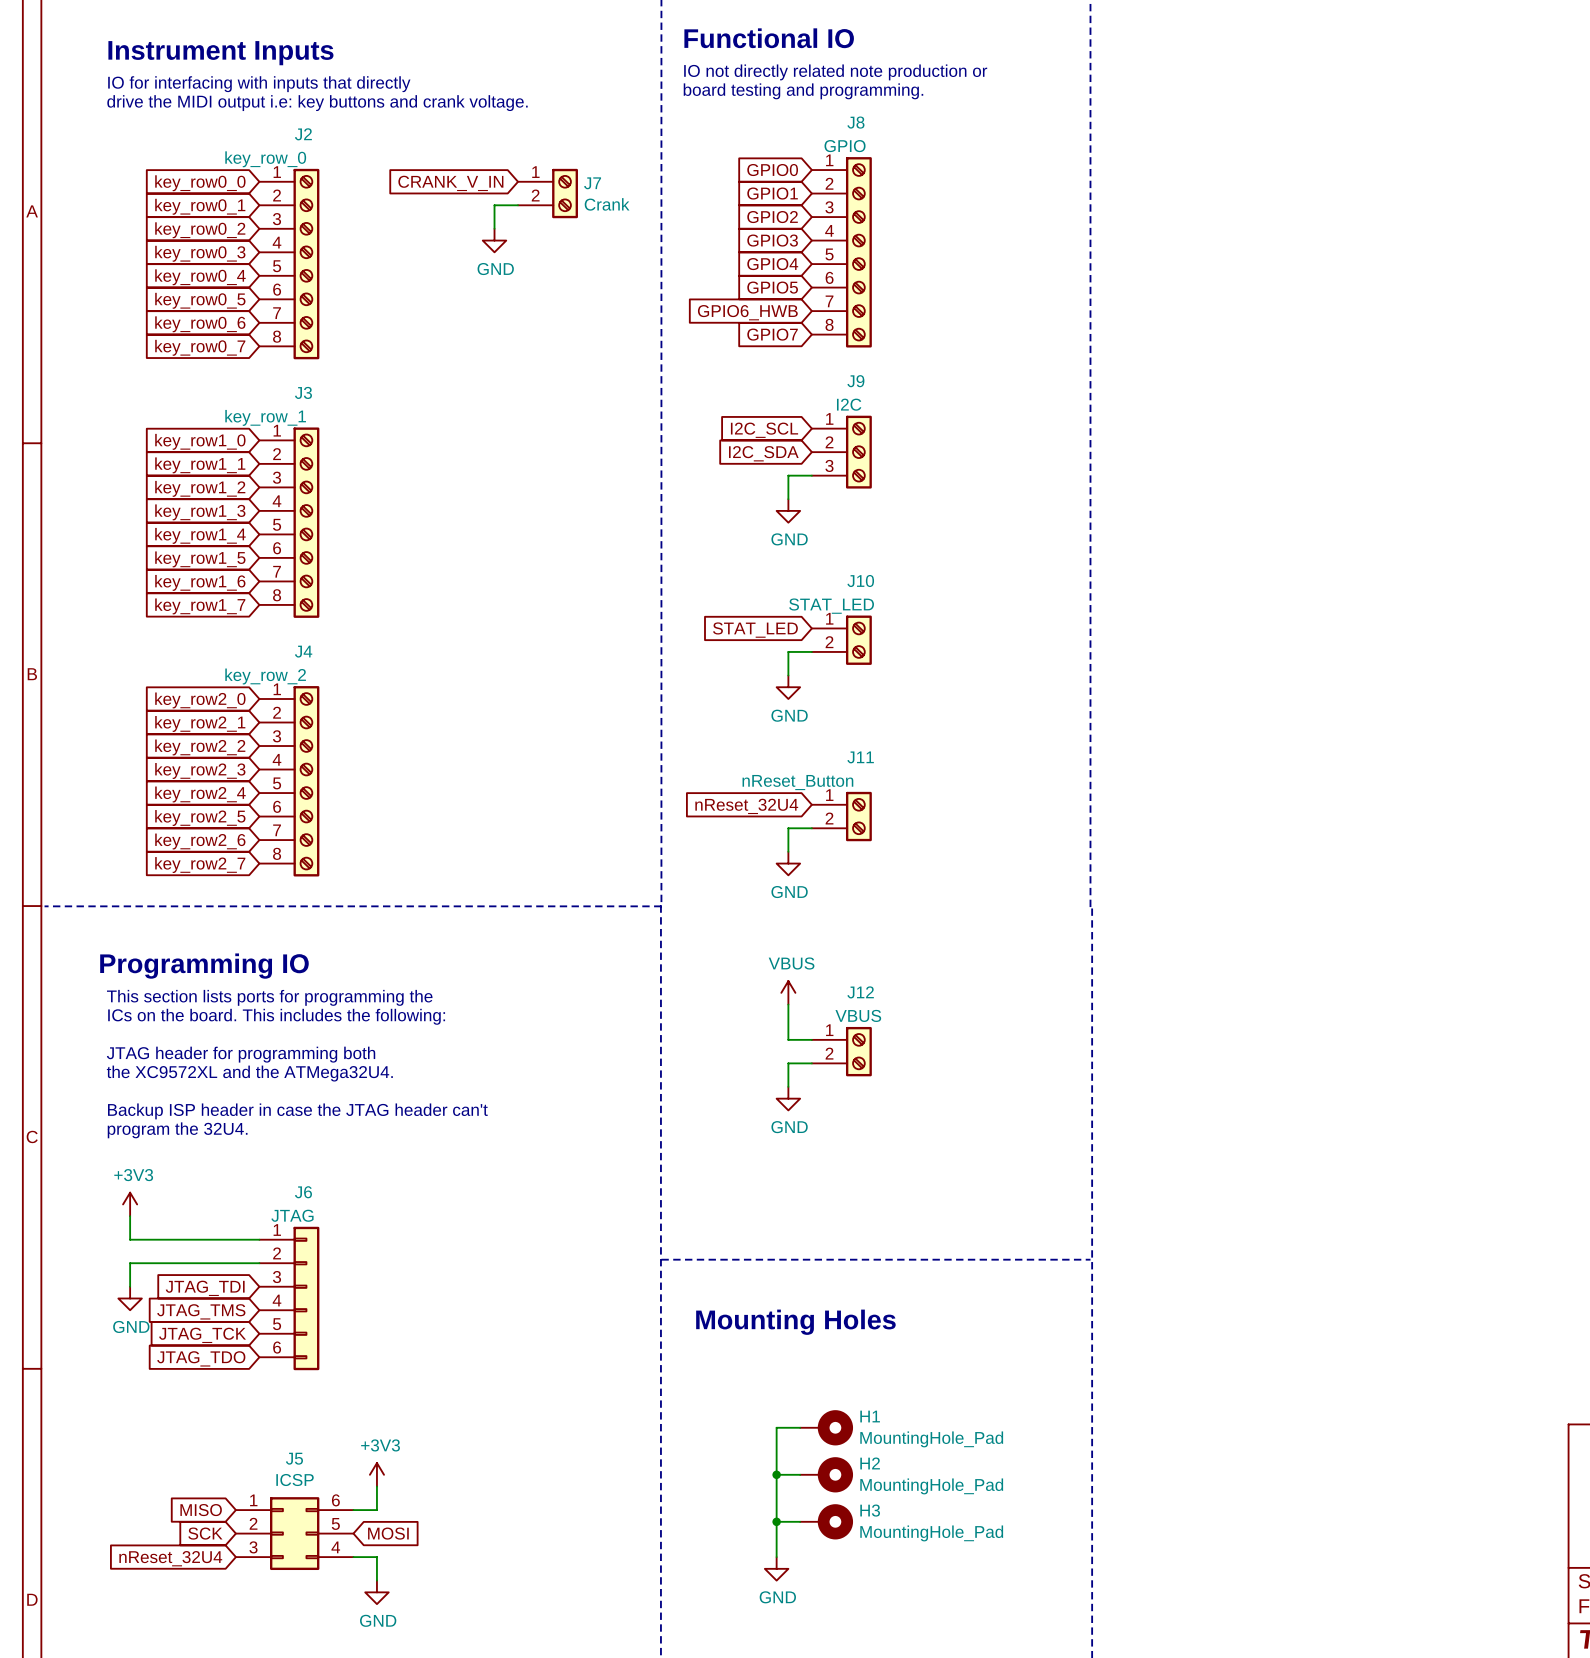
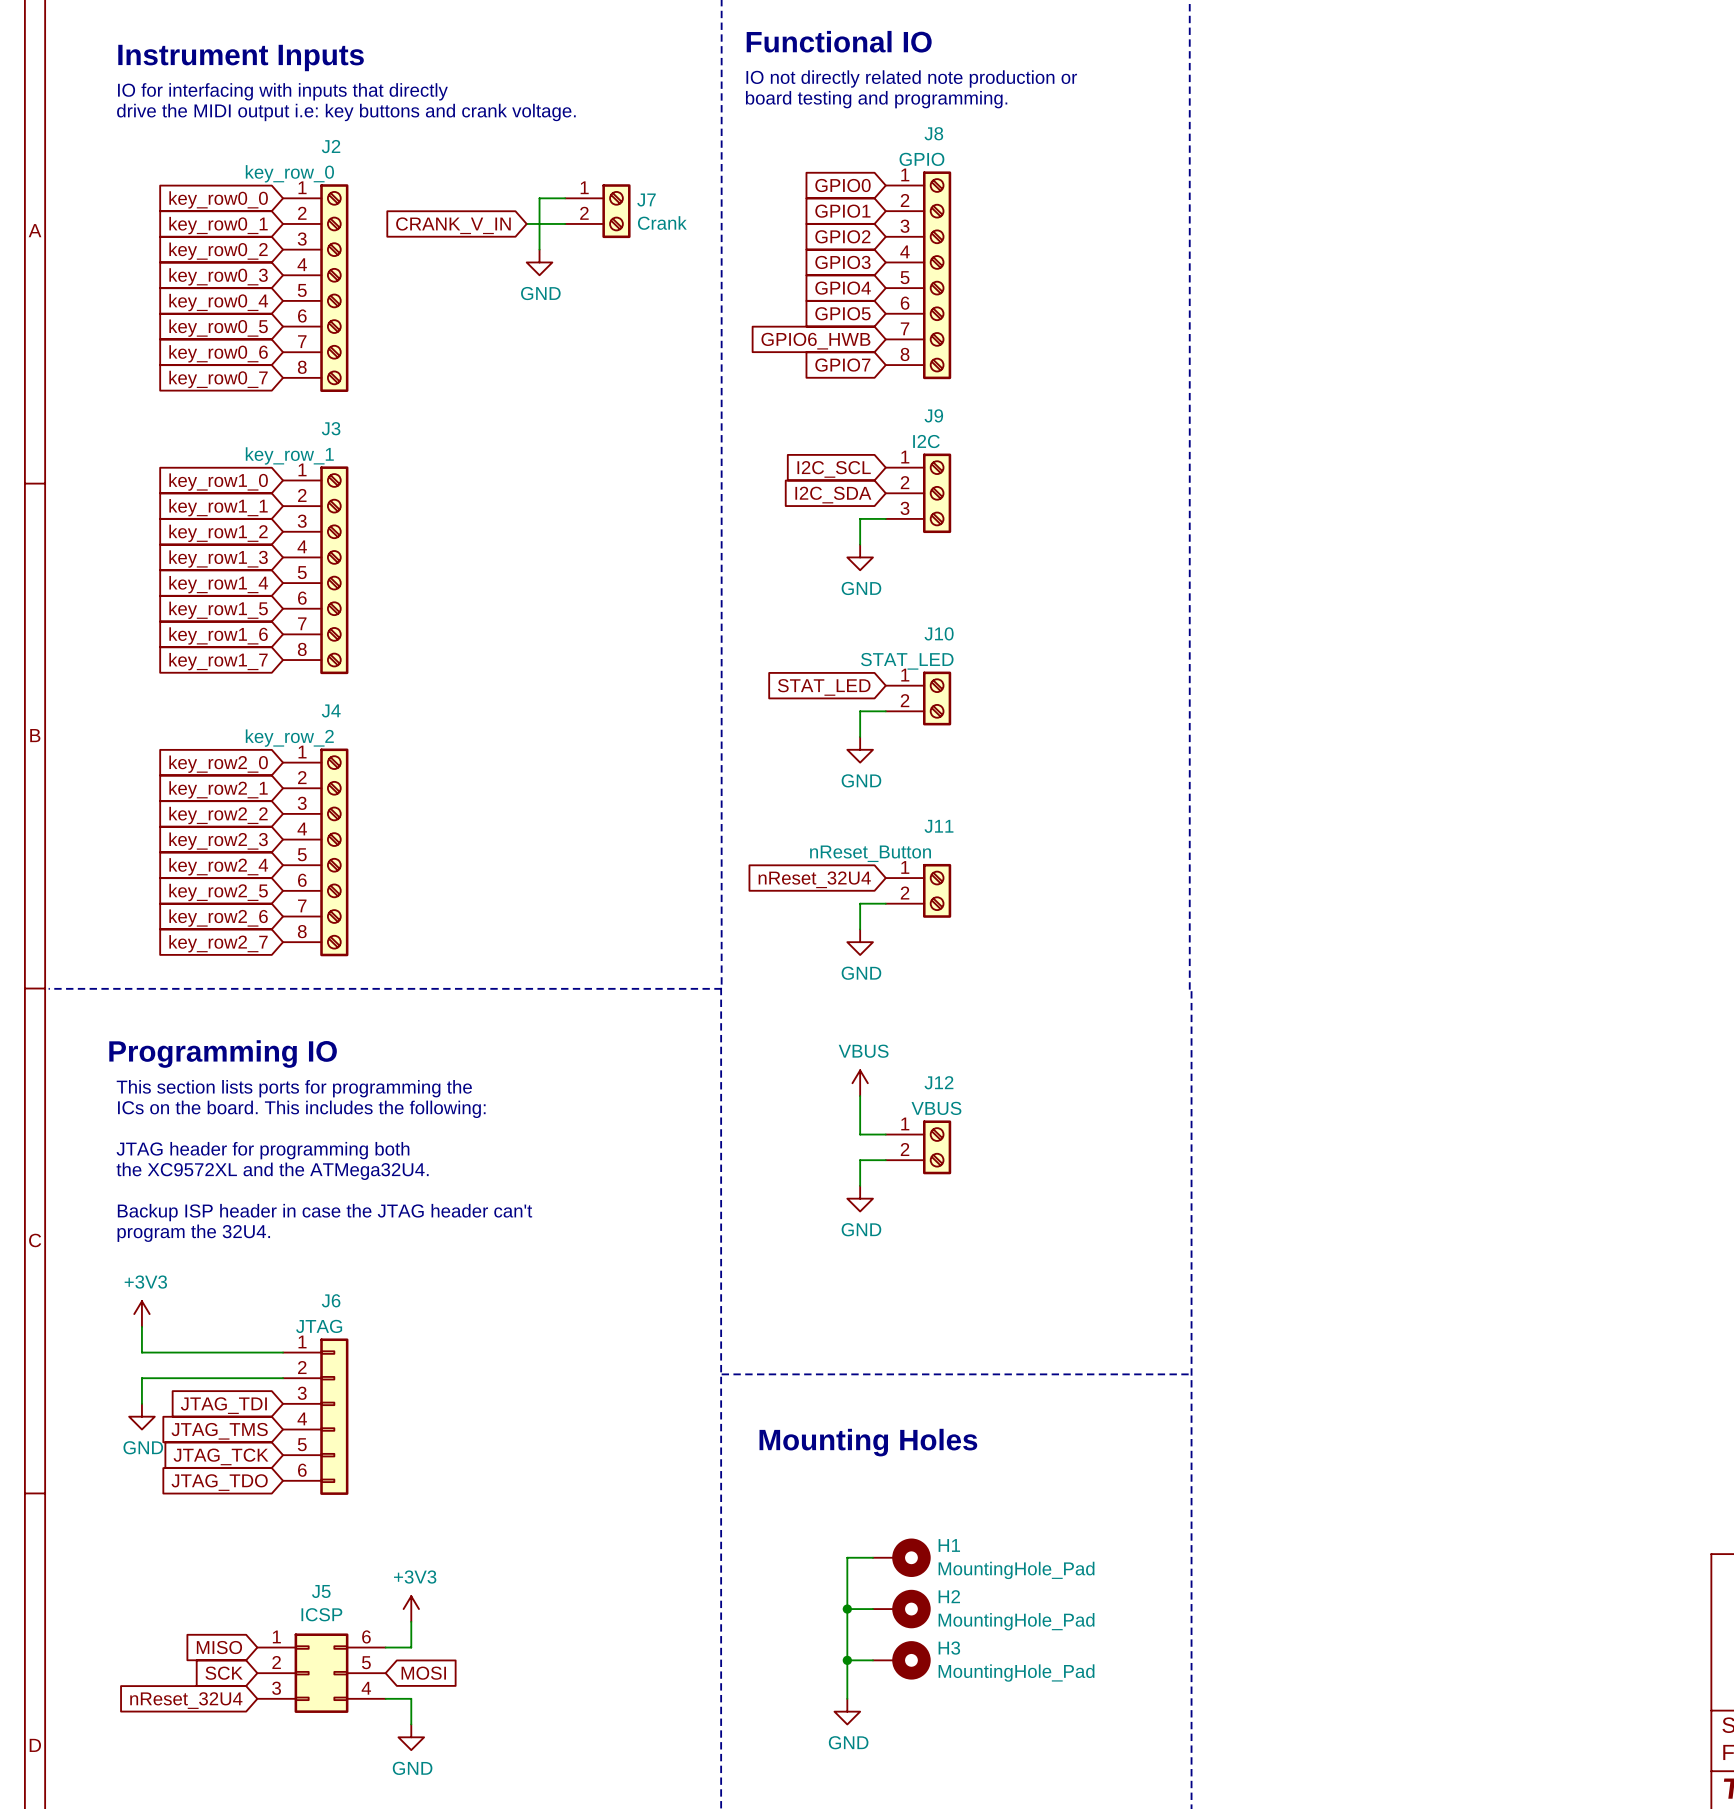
wire: none -> (565, 198) (539, 198) (539, 223) (526, 223)
global label position: CRANK_V_IN (450, 183) -> CRANK_V_IN (453, 225)

